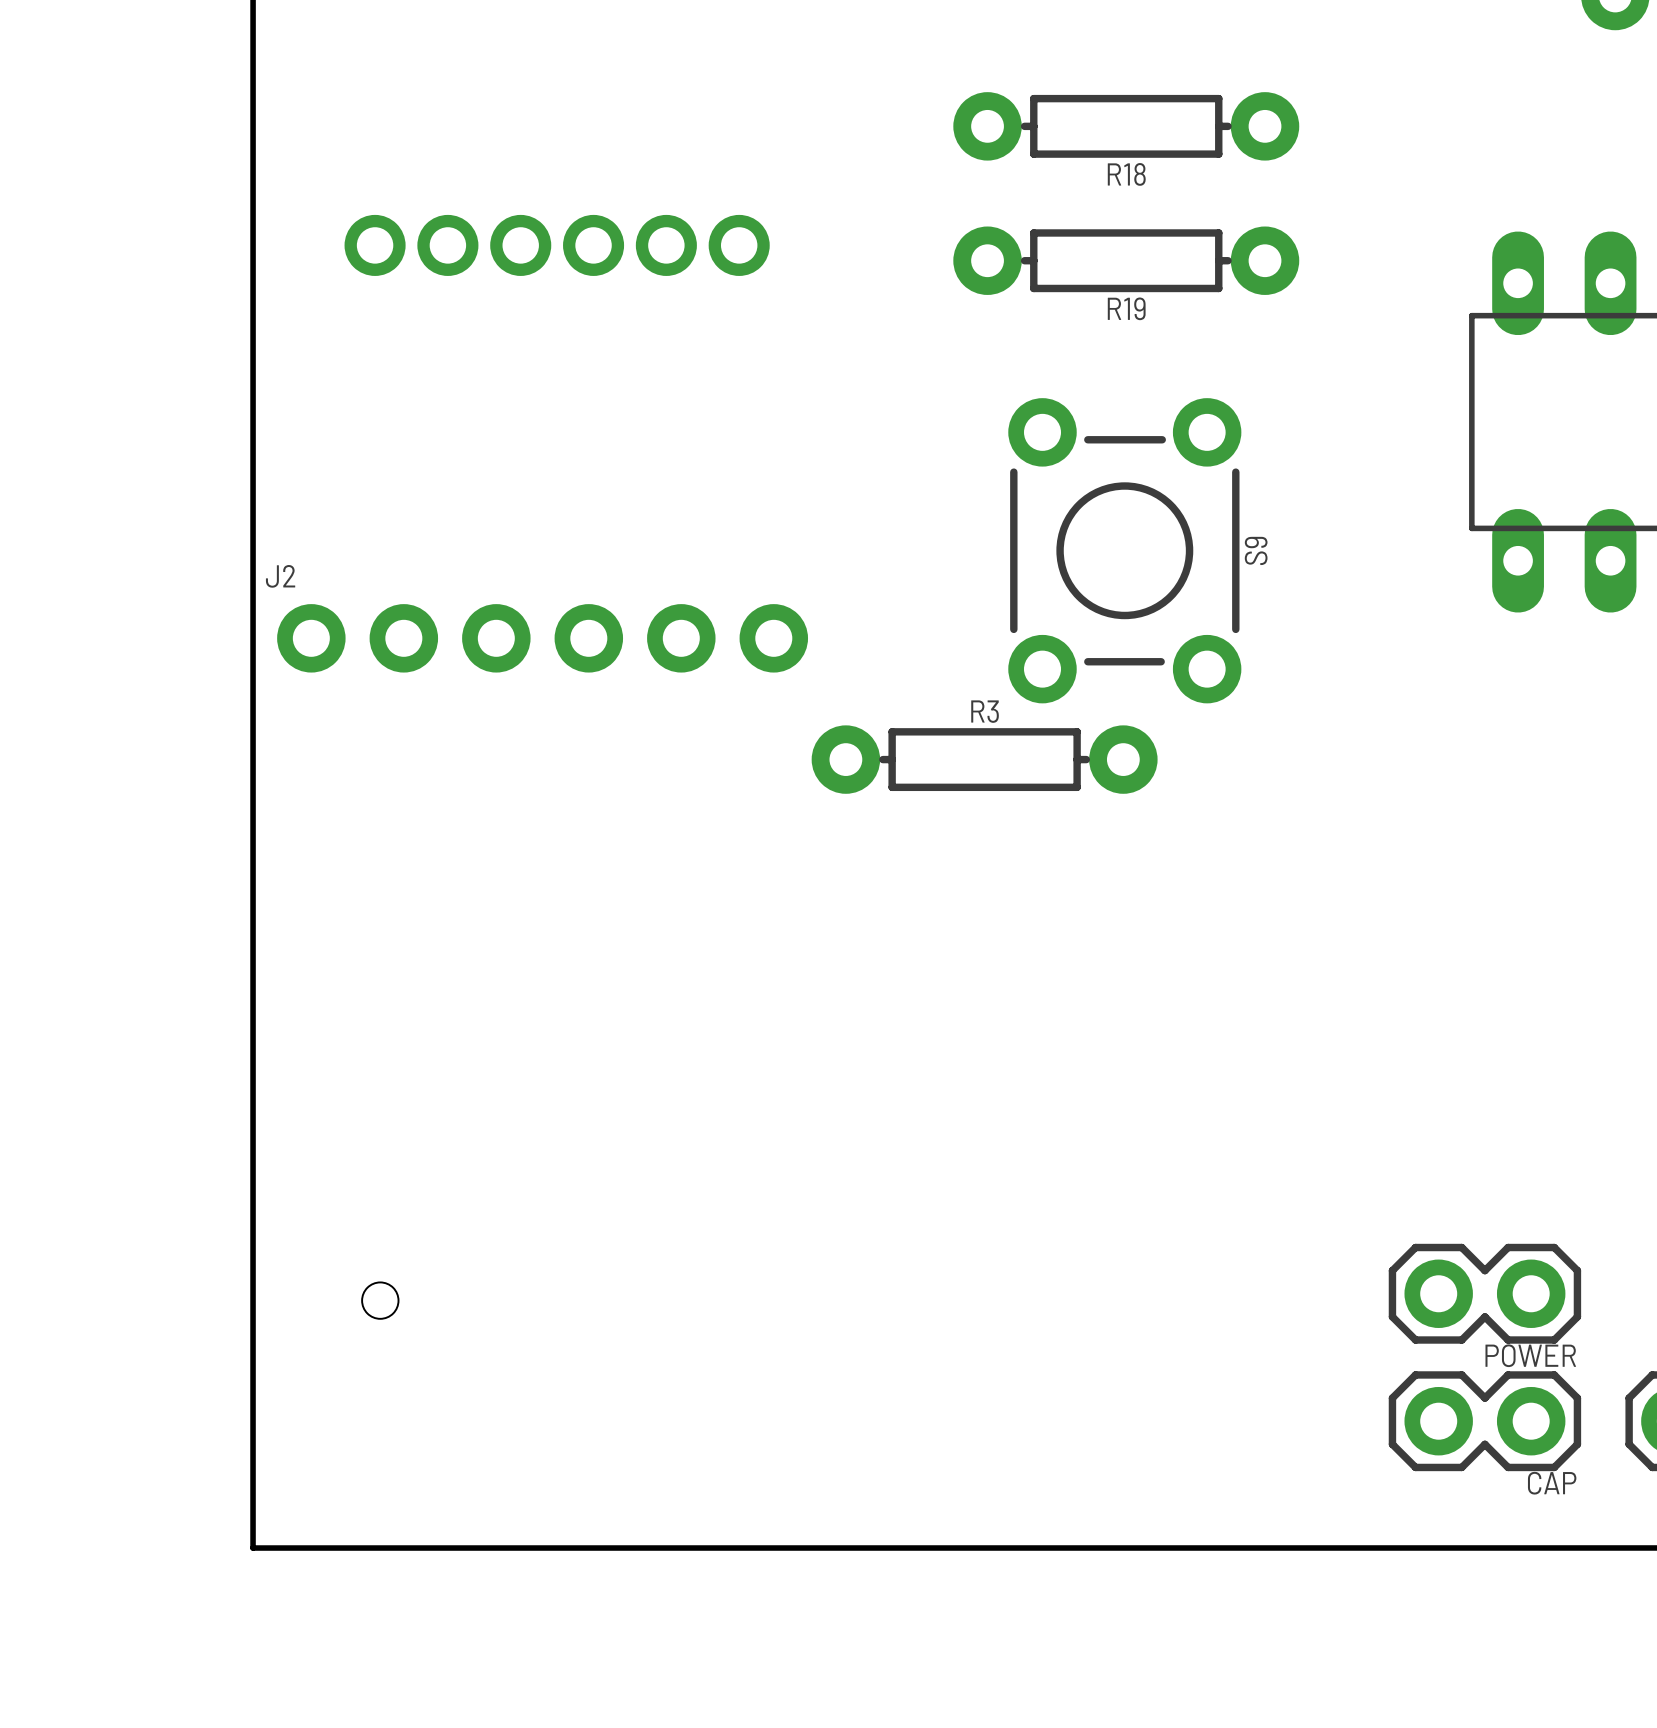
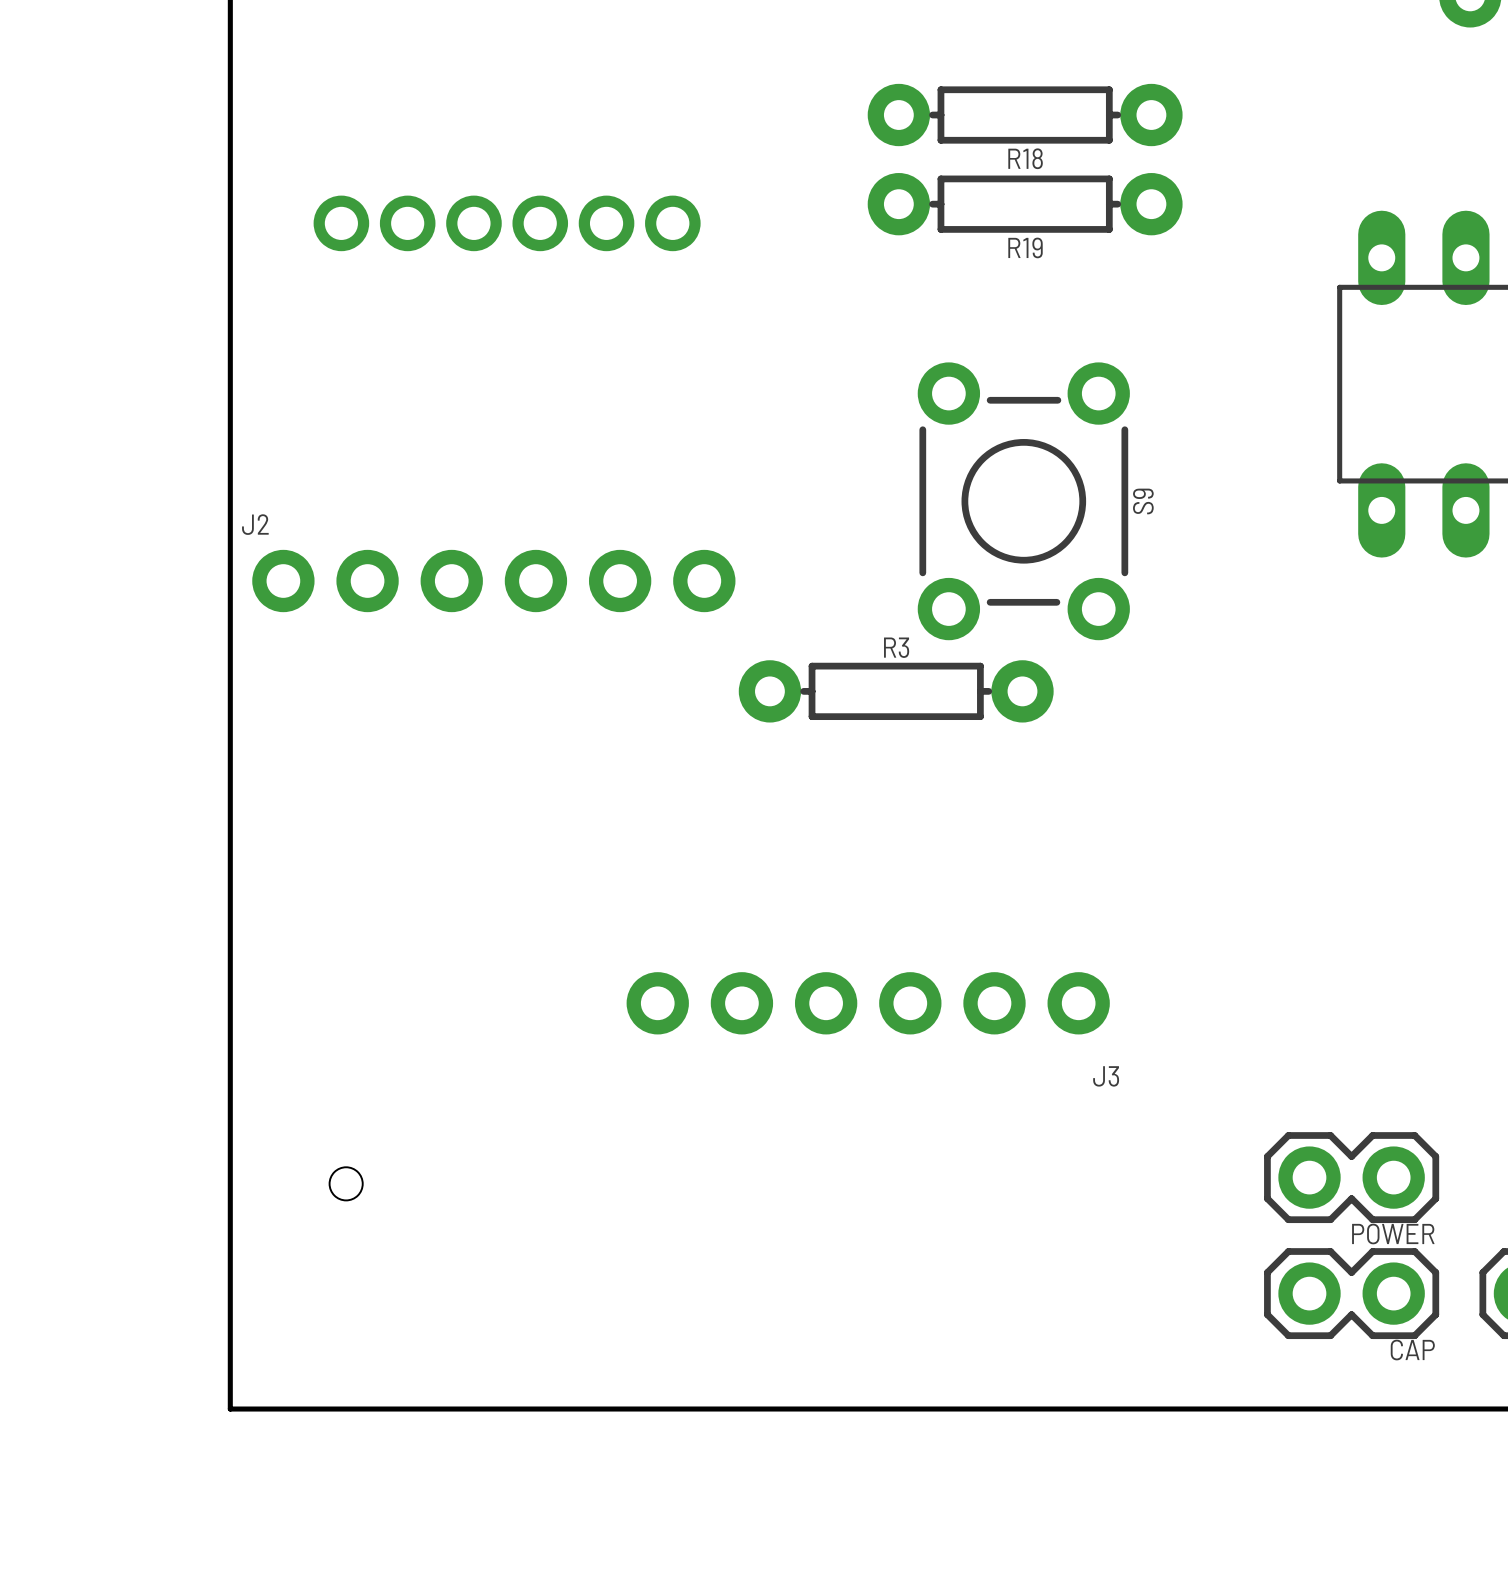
R19 position: (1126, 260) -> (1025, 204)
J3: none -> (868, 1003)

